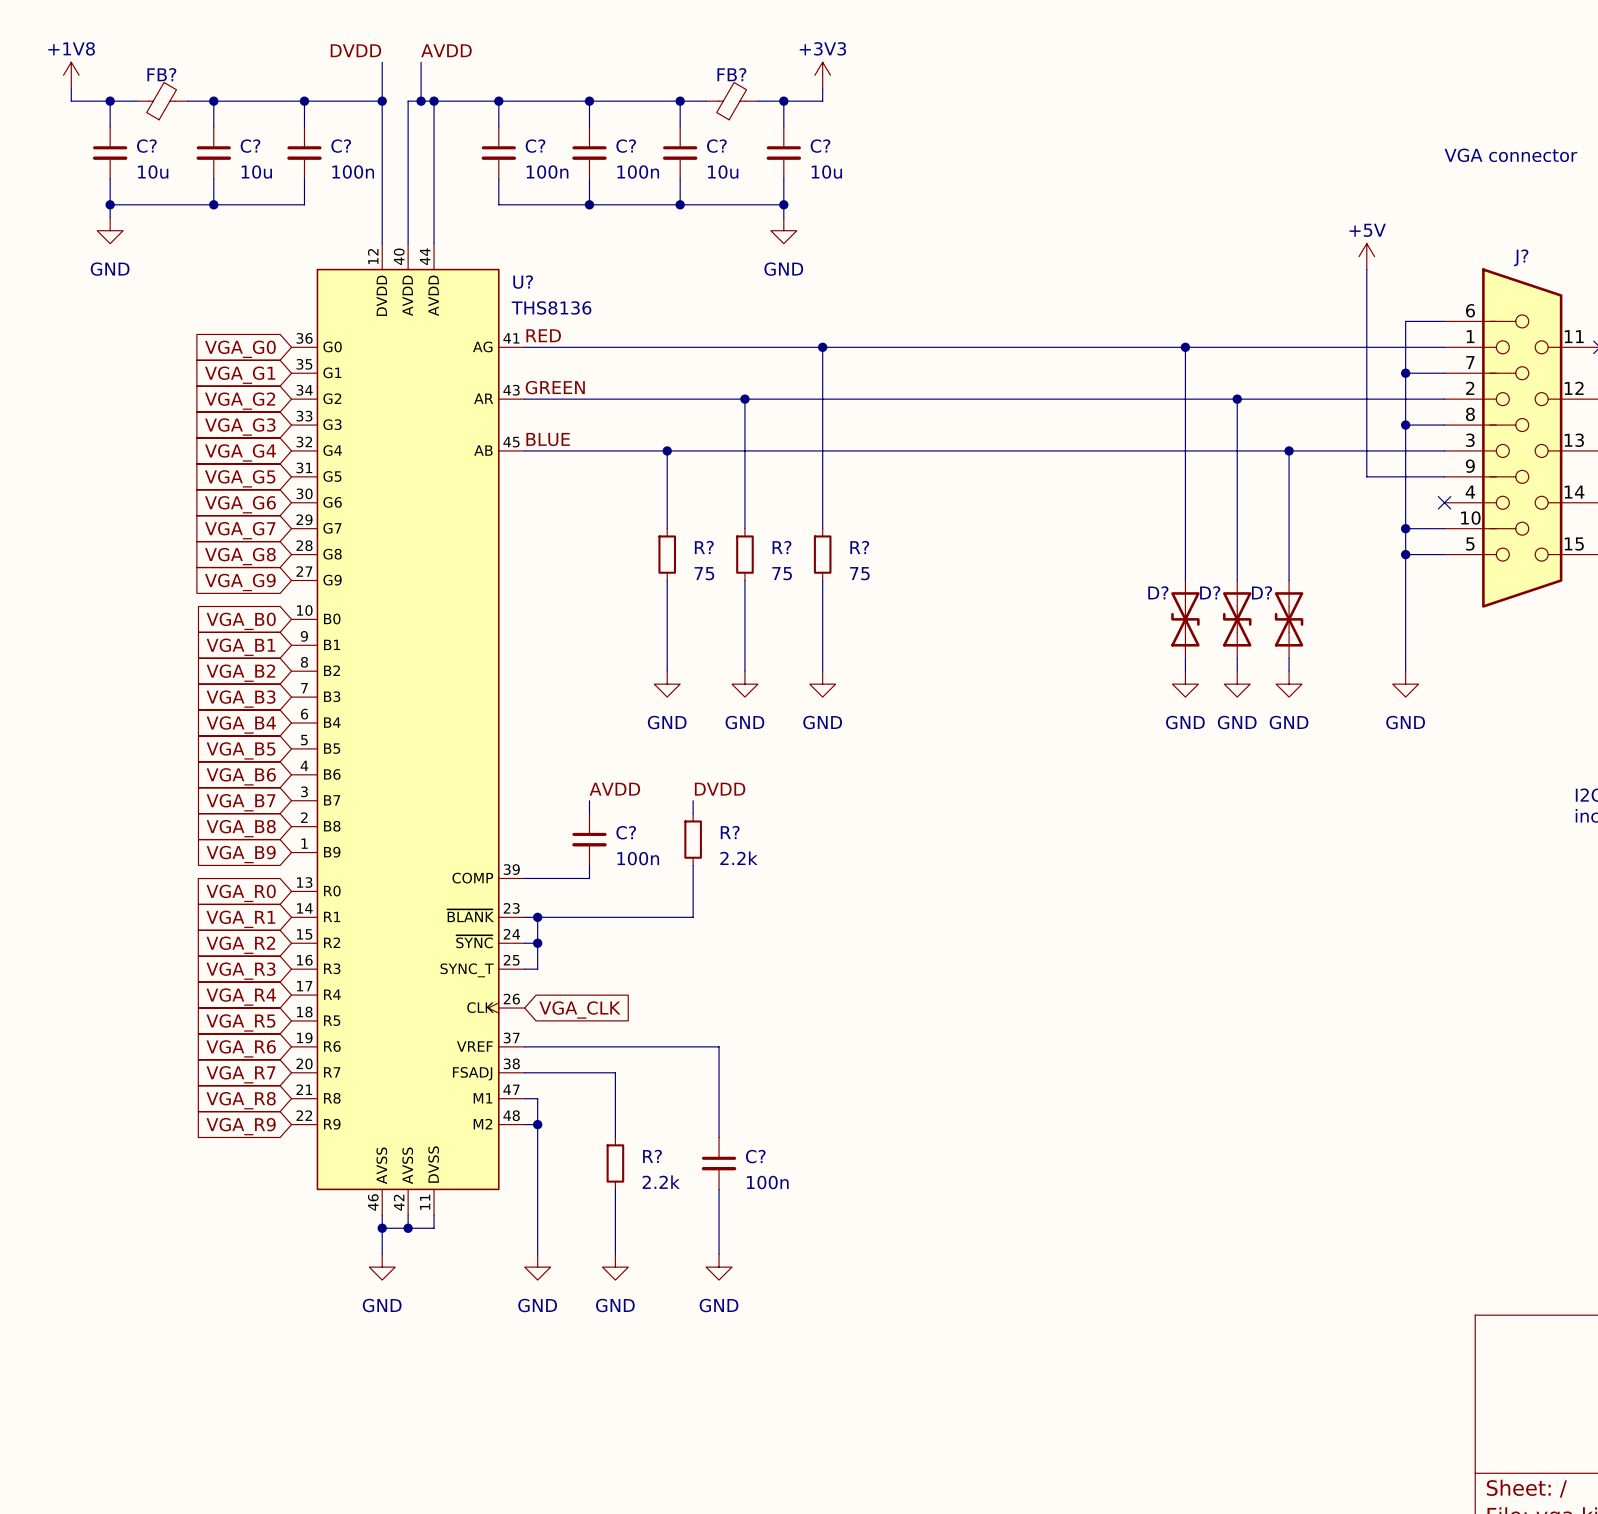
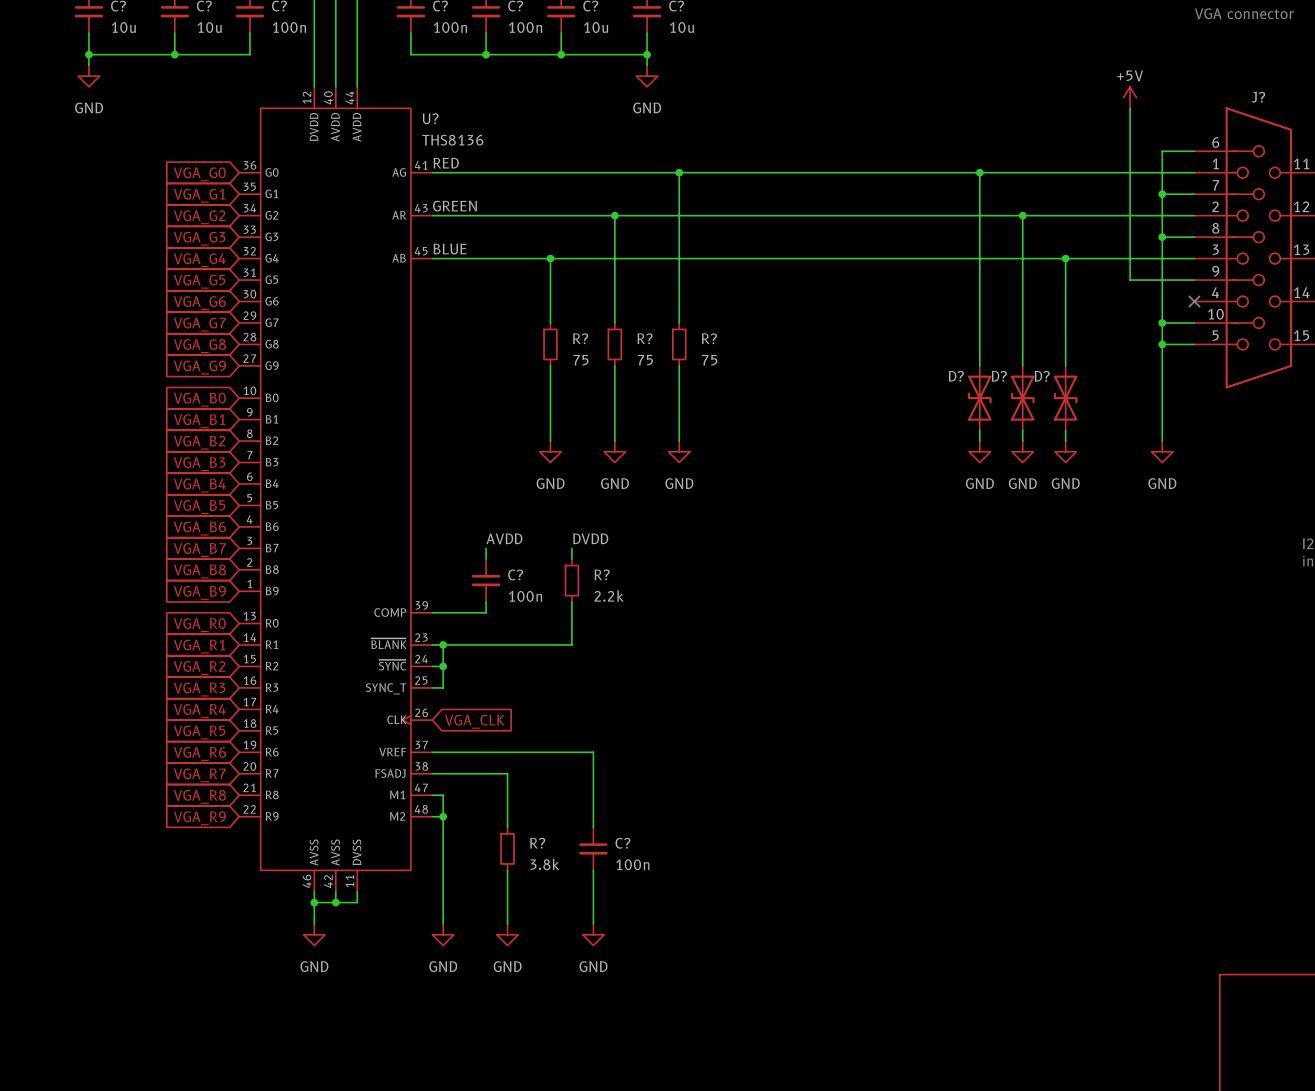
R? value: 2.2k (661, 1182) -> 3.8k (544, 864)

